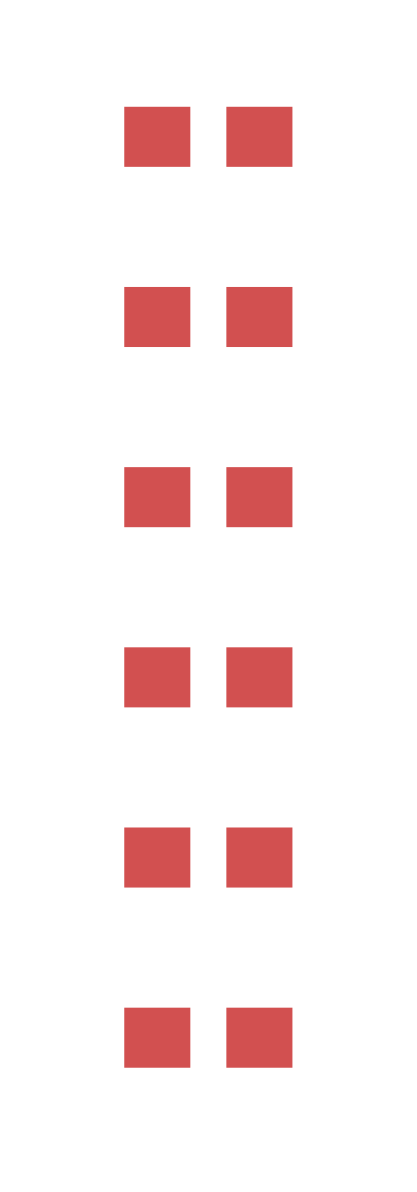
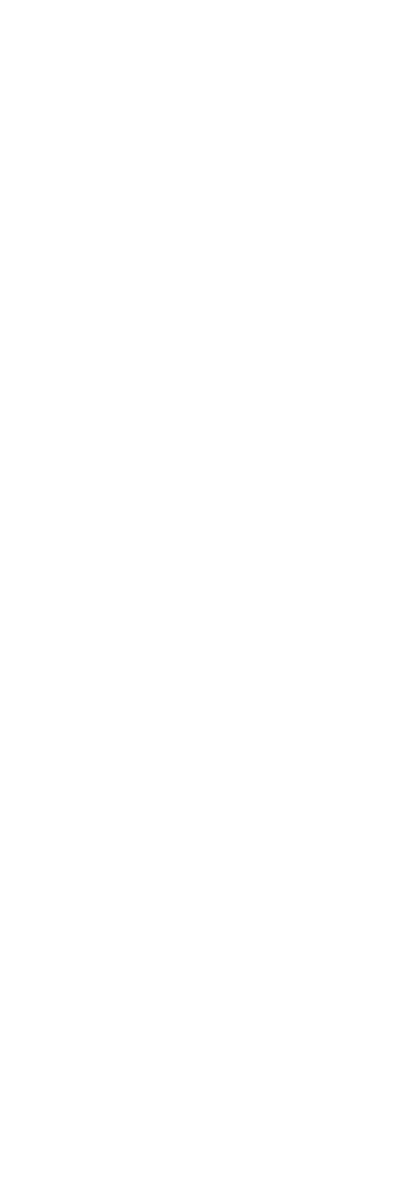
part: (208, 136) -> none
part: (208, 316) -> none
part: (208, 497) -> none
part: (208, 677) -> none
part: (208, 857) -> none
part: (208, 1037) -> none

